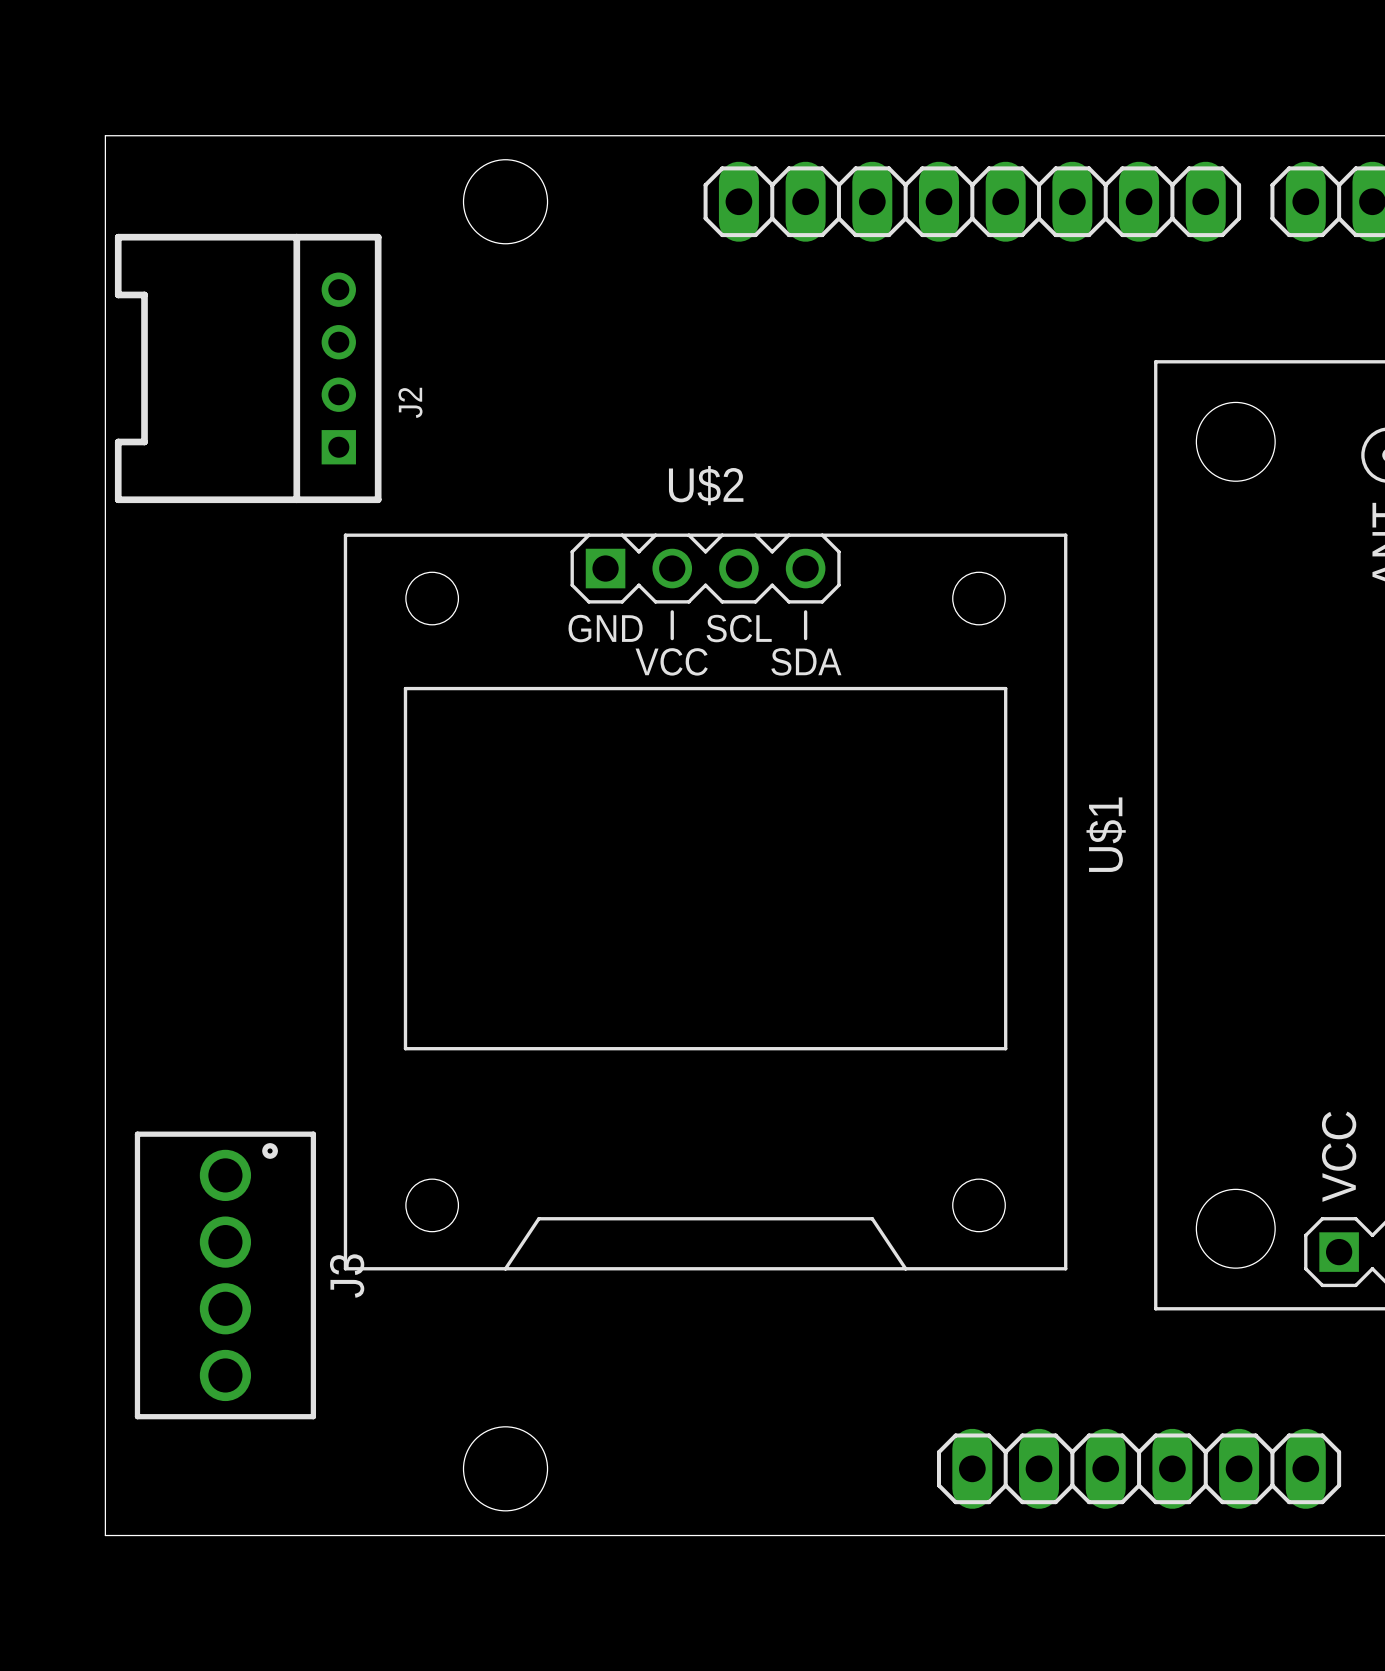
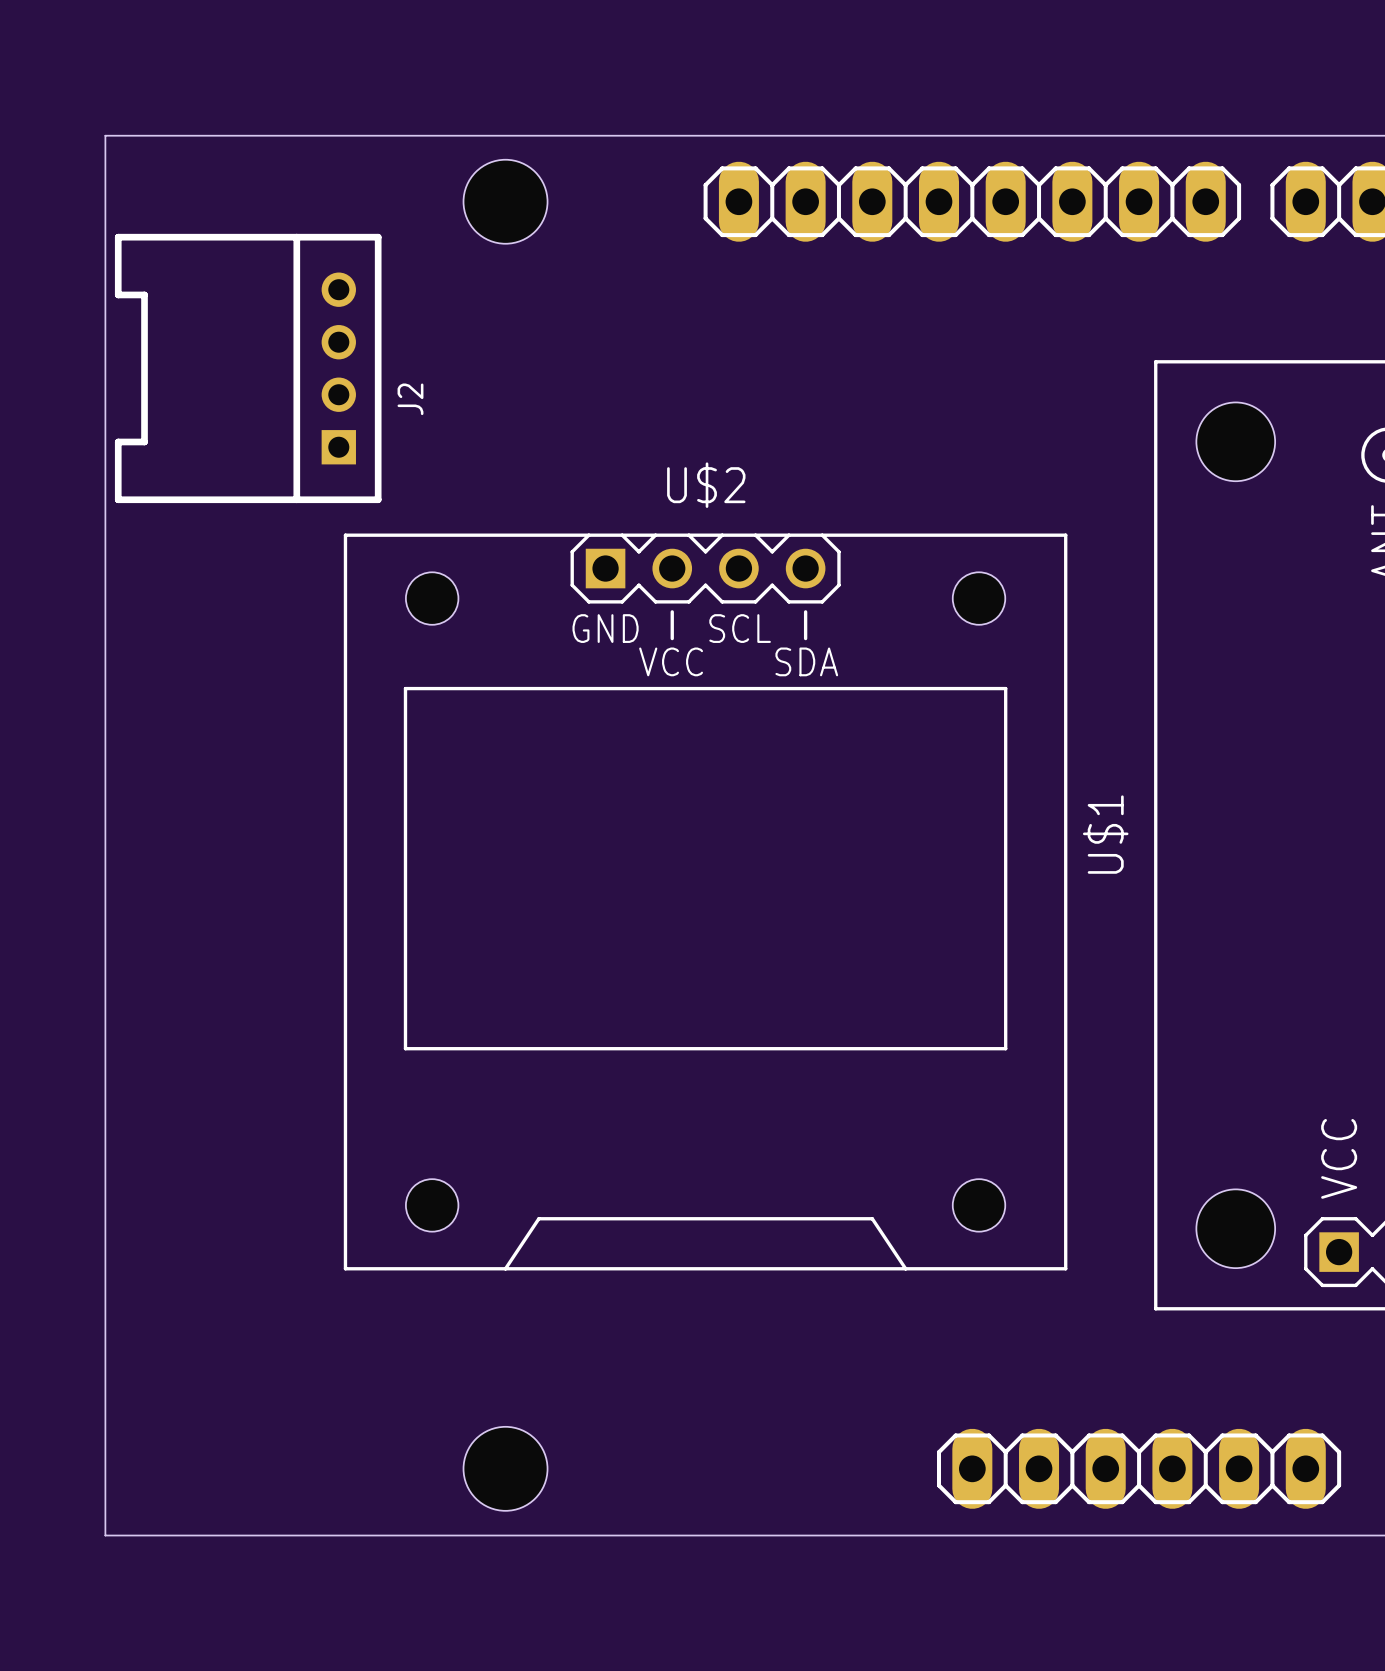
J3: (225, 1275) -> none

